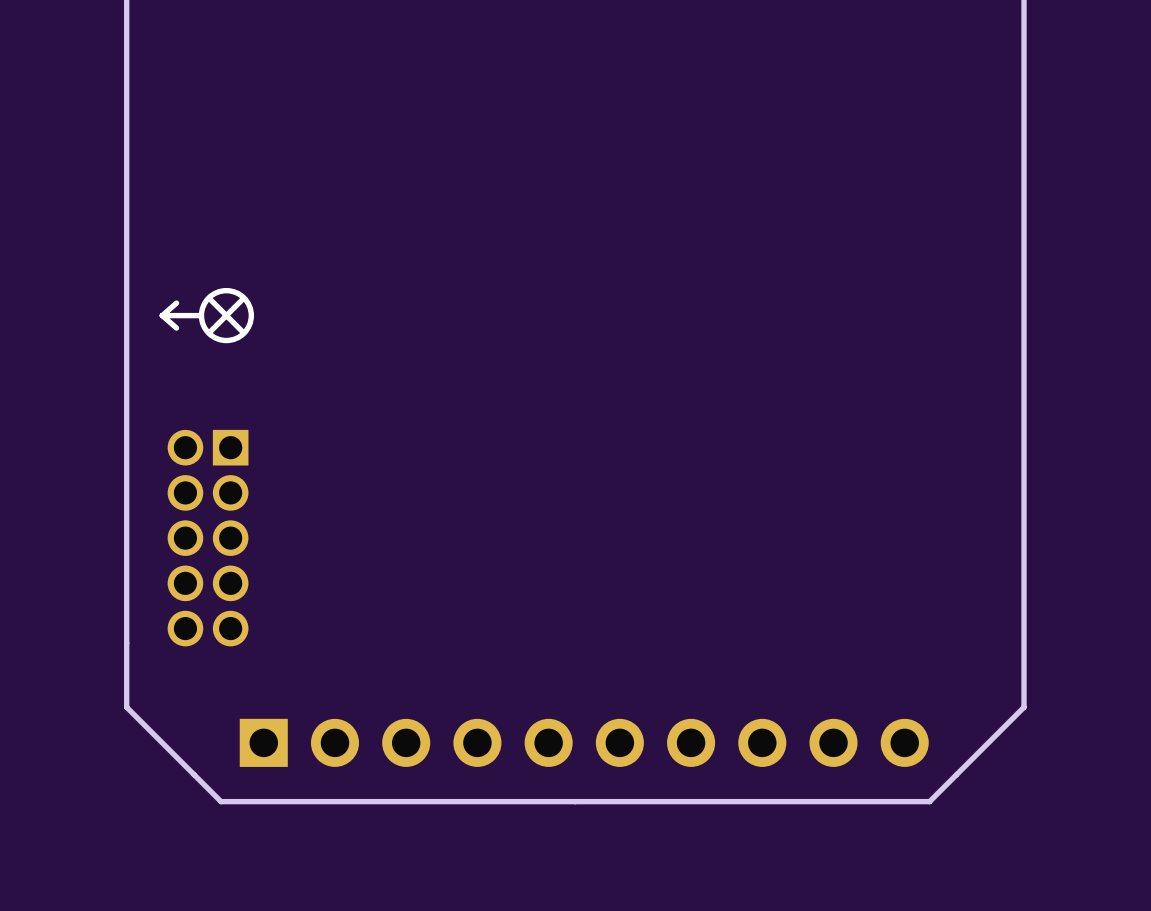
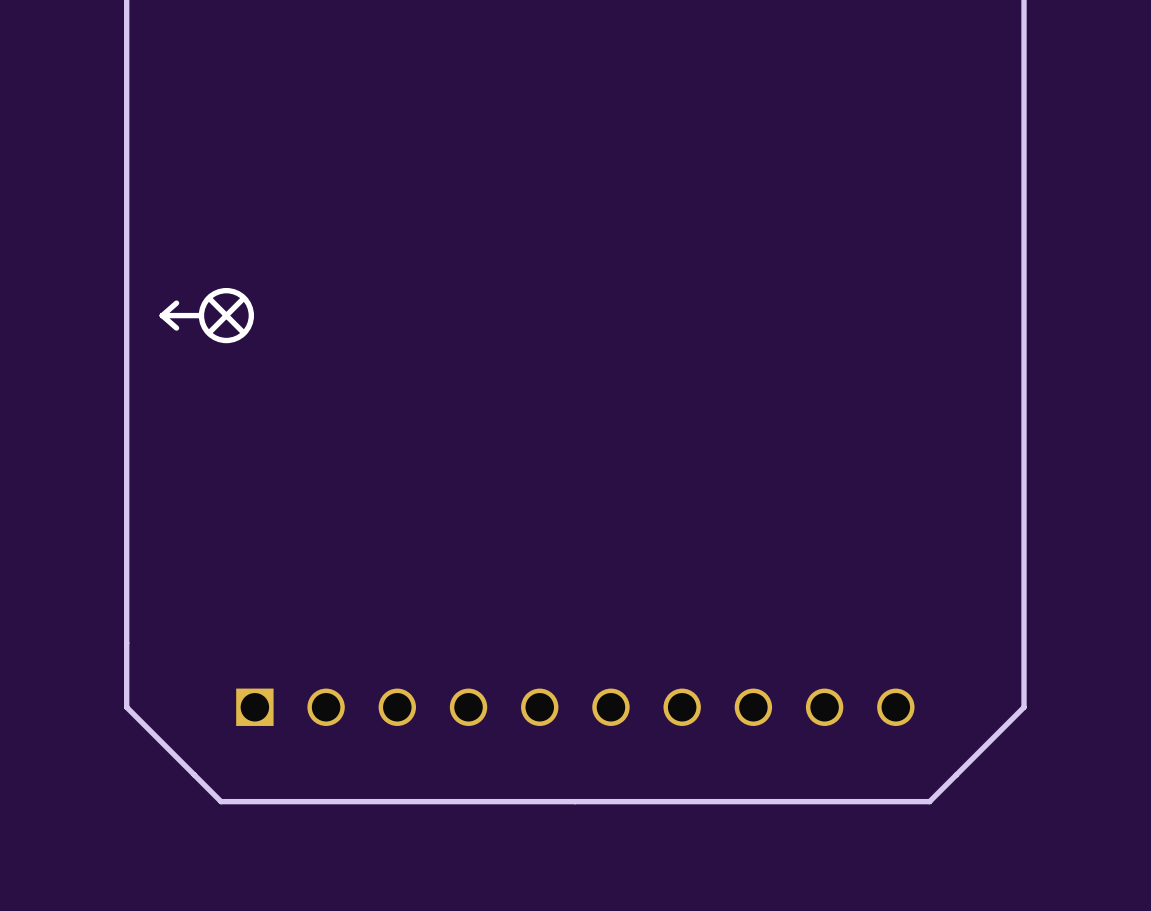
part: (208, 538) -> none
part: none -> (575, 707)
part: (584, 742) -> none

